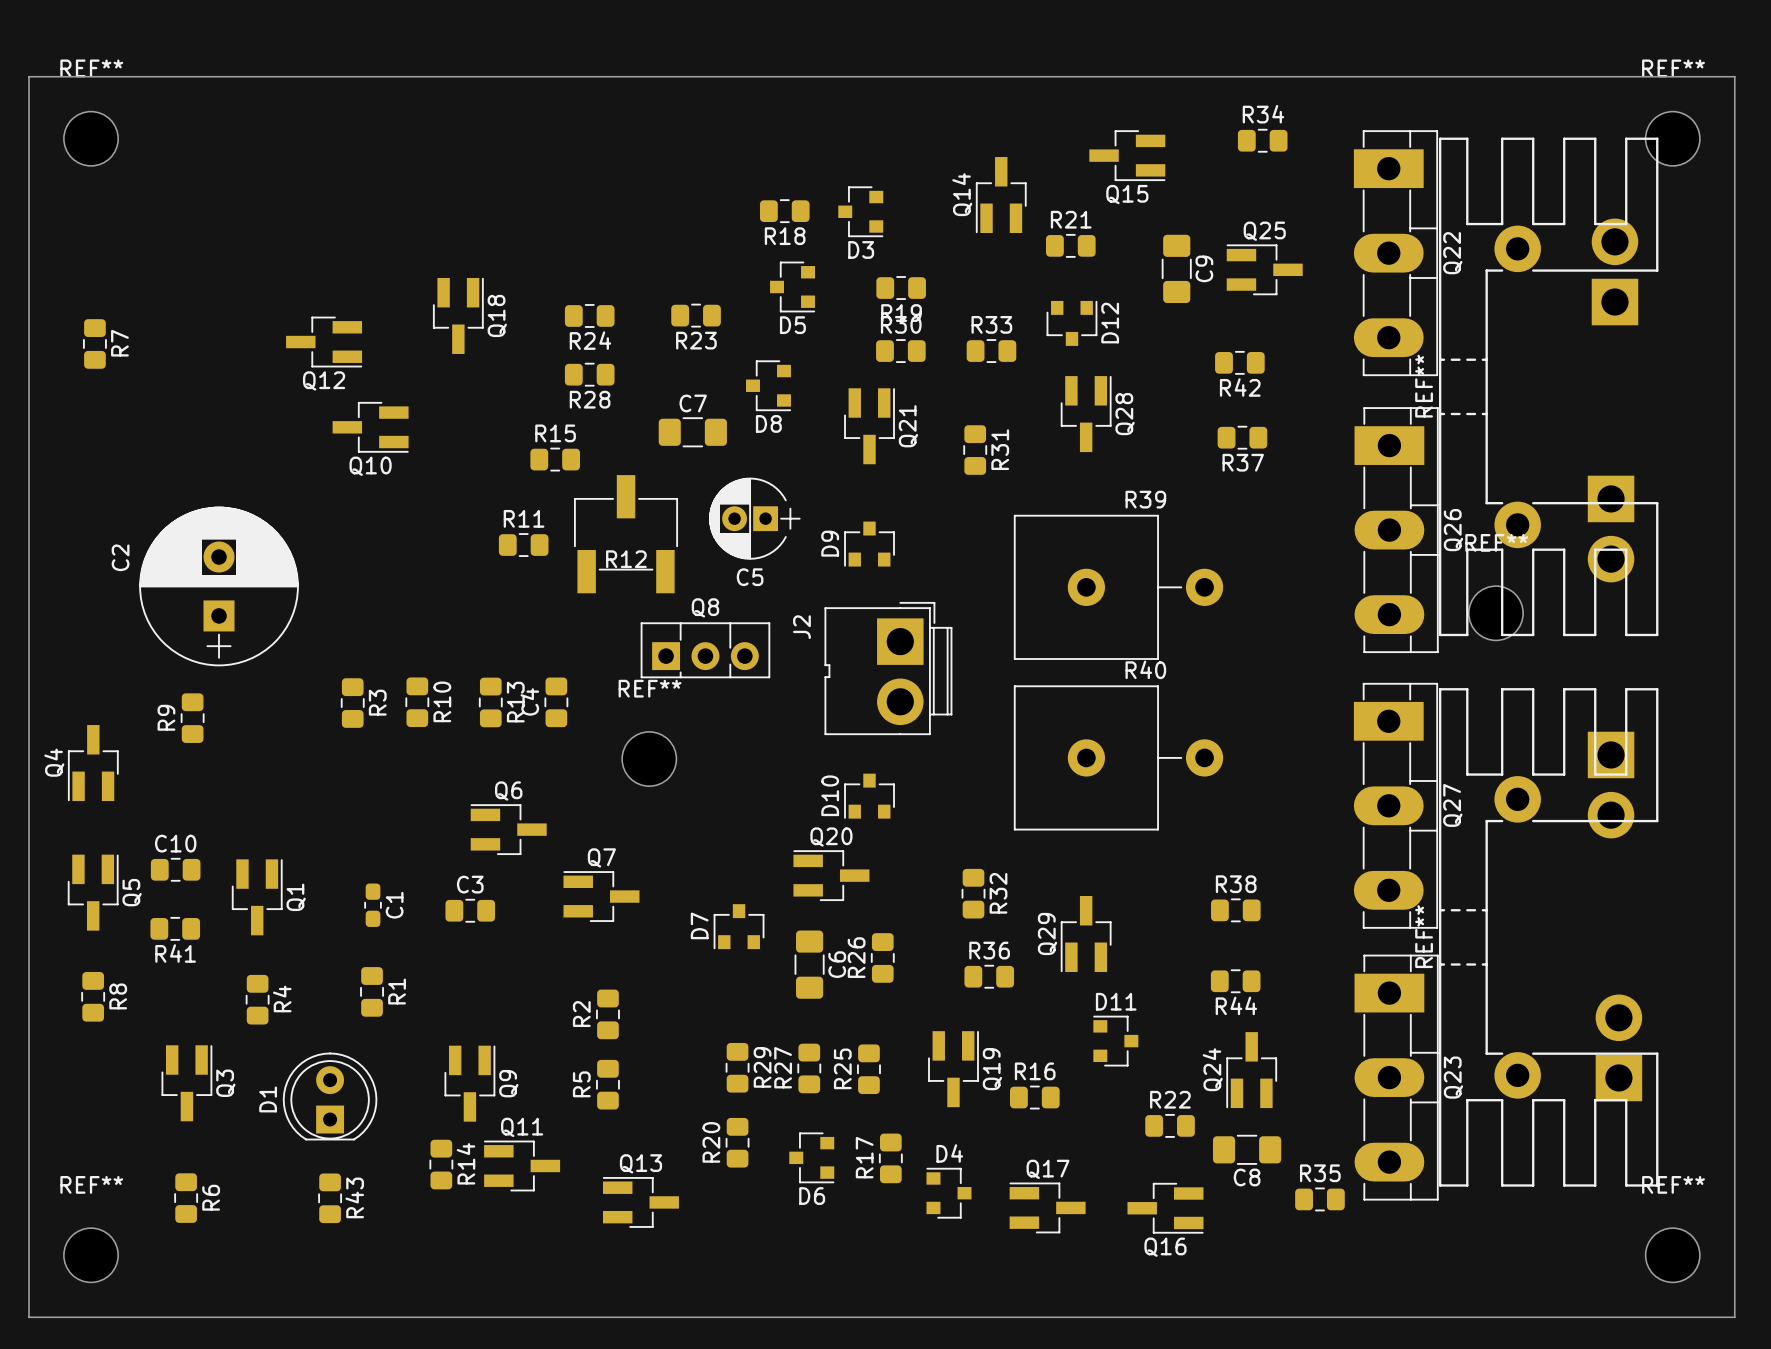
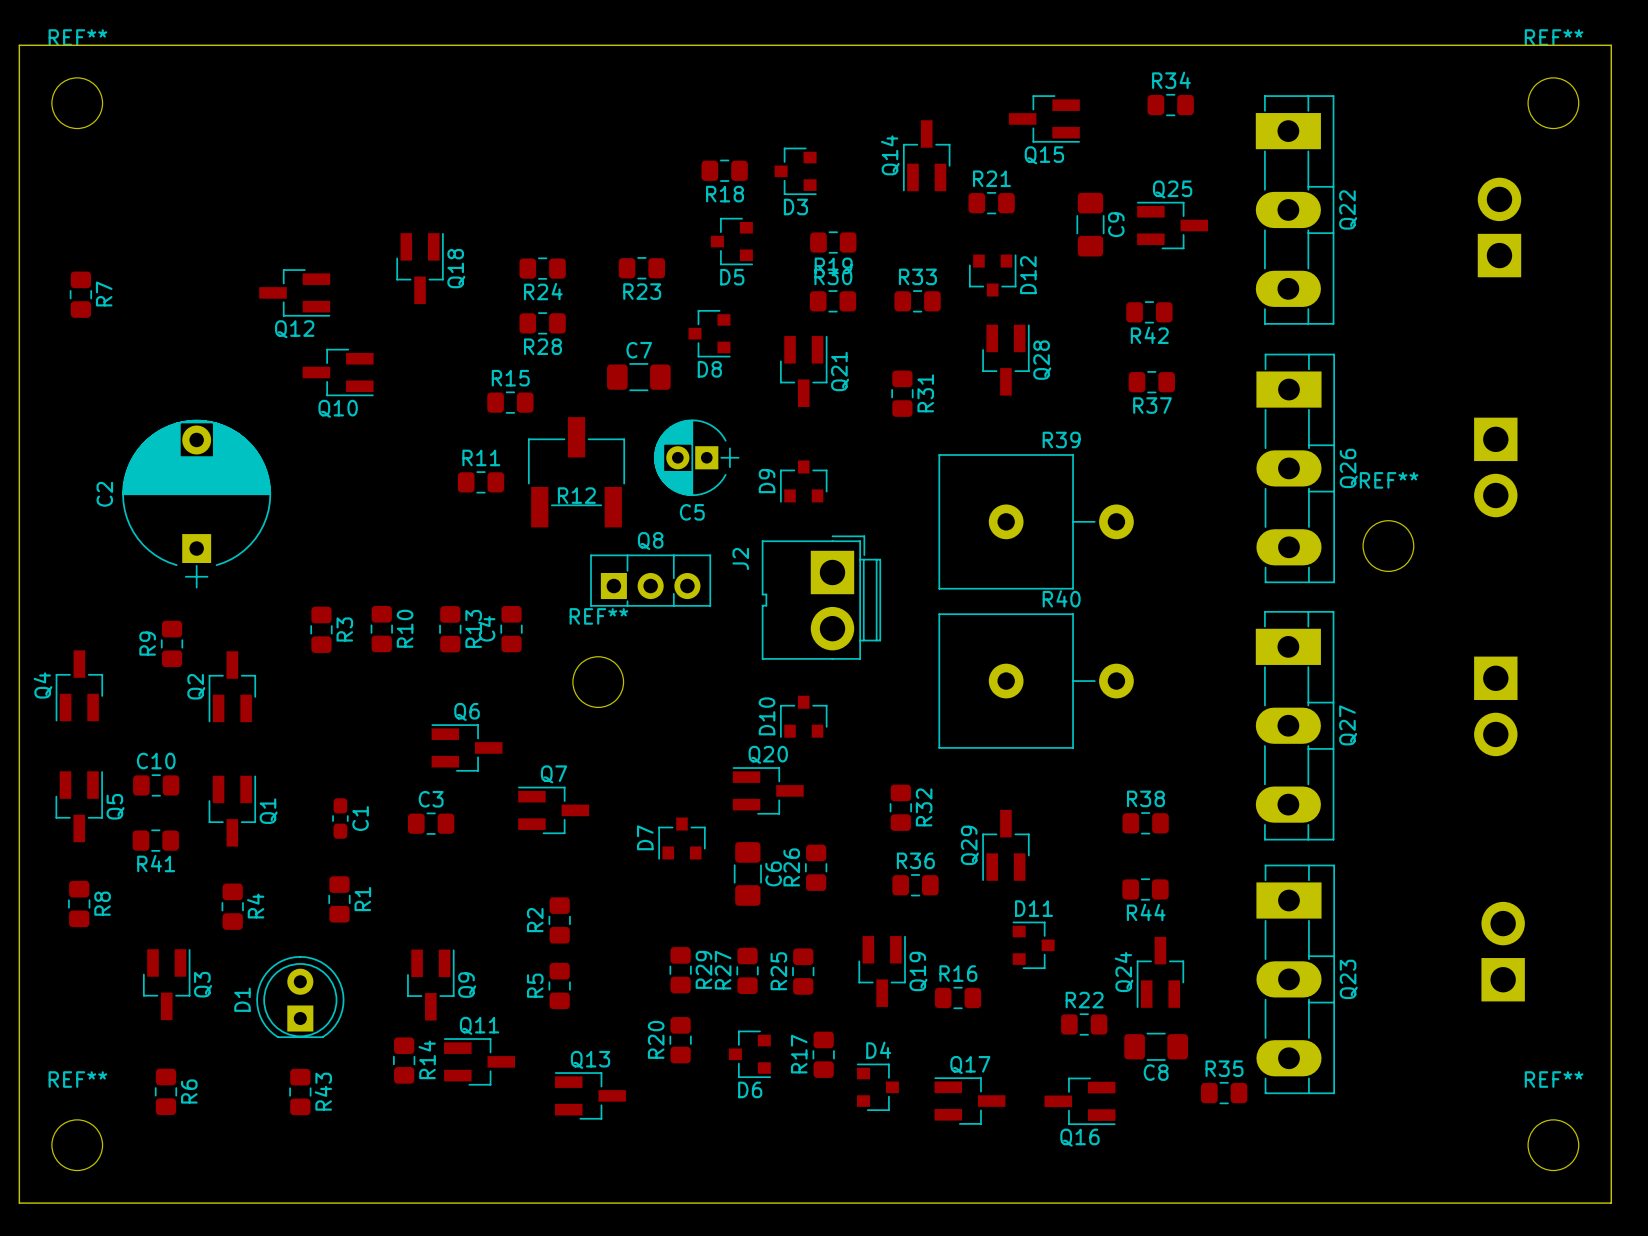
REF**: (1548, 386) -> none
C2 footprint: [139, 506, 299, 667] -> [122, 419, 272, 589]
Q2: none -> (232, 686)
REF**: (1548, 937) -> none

